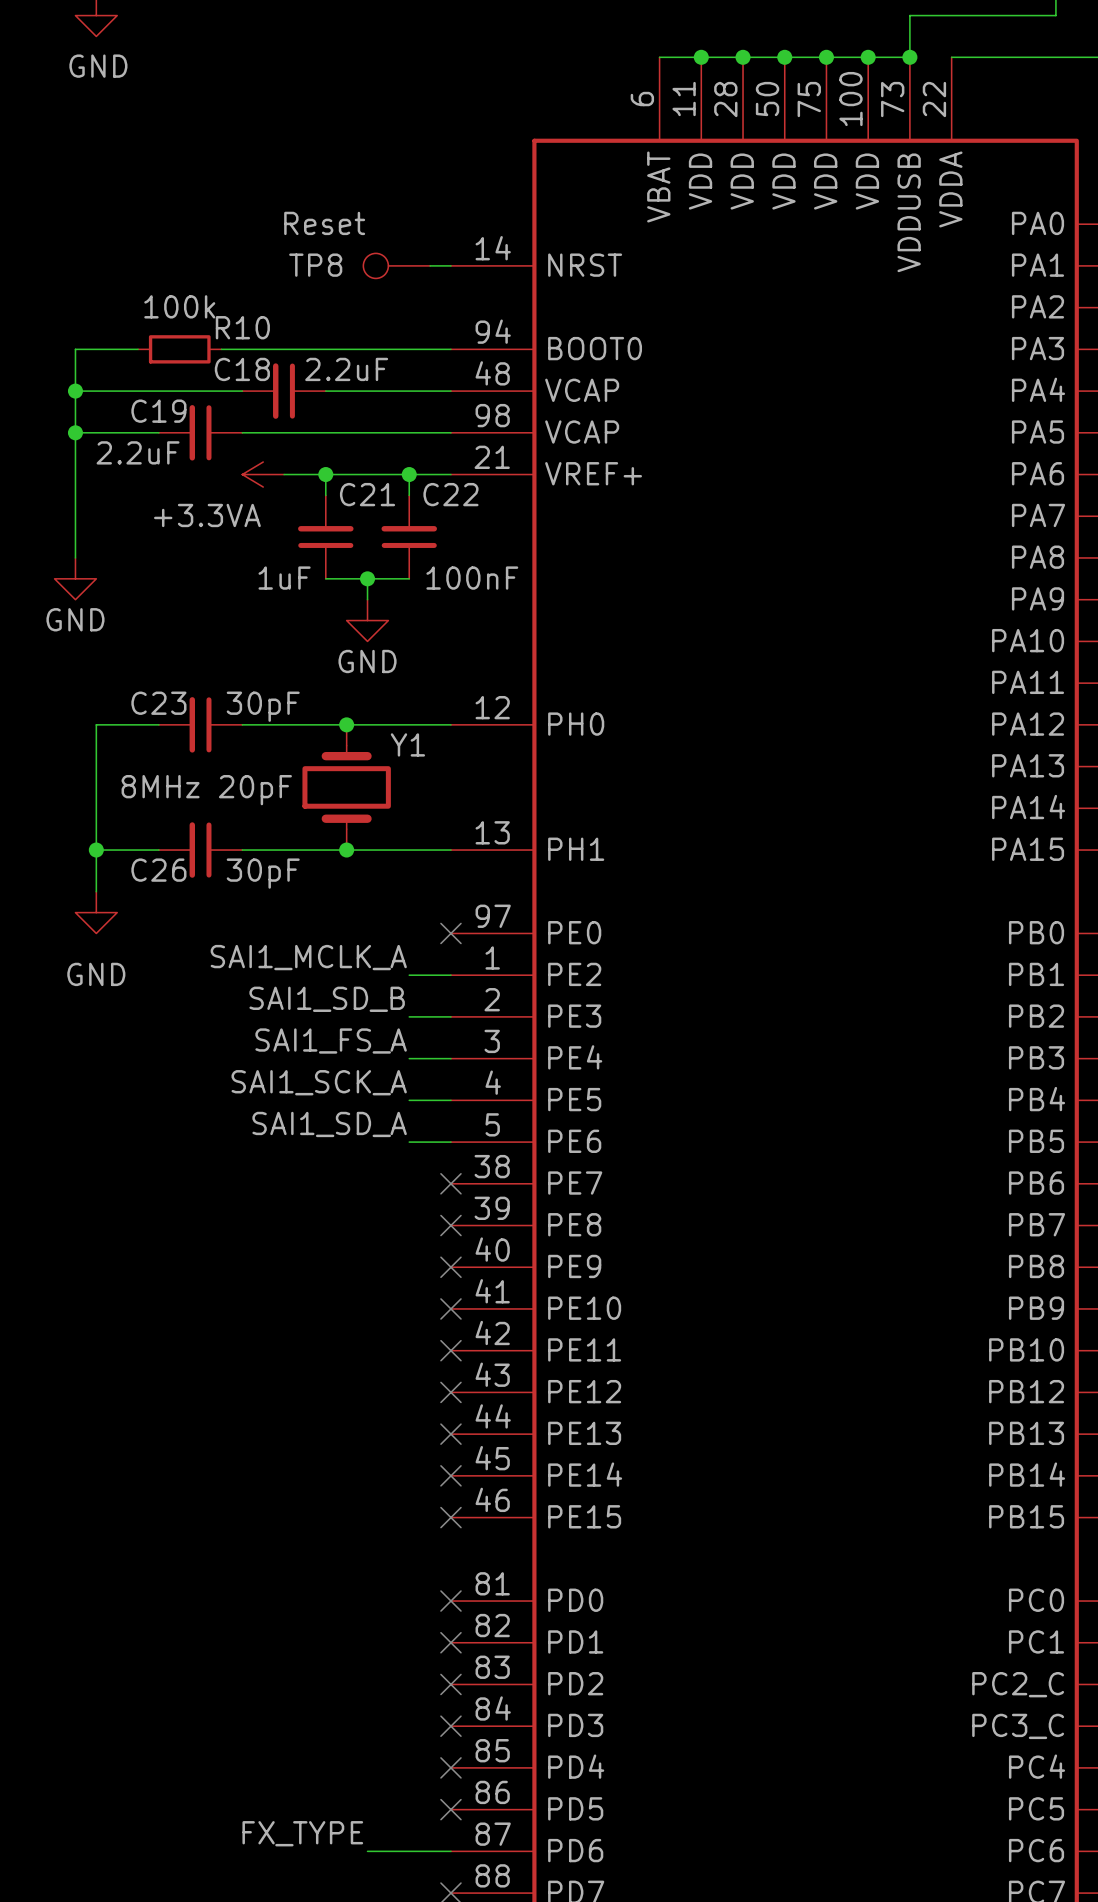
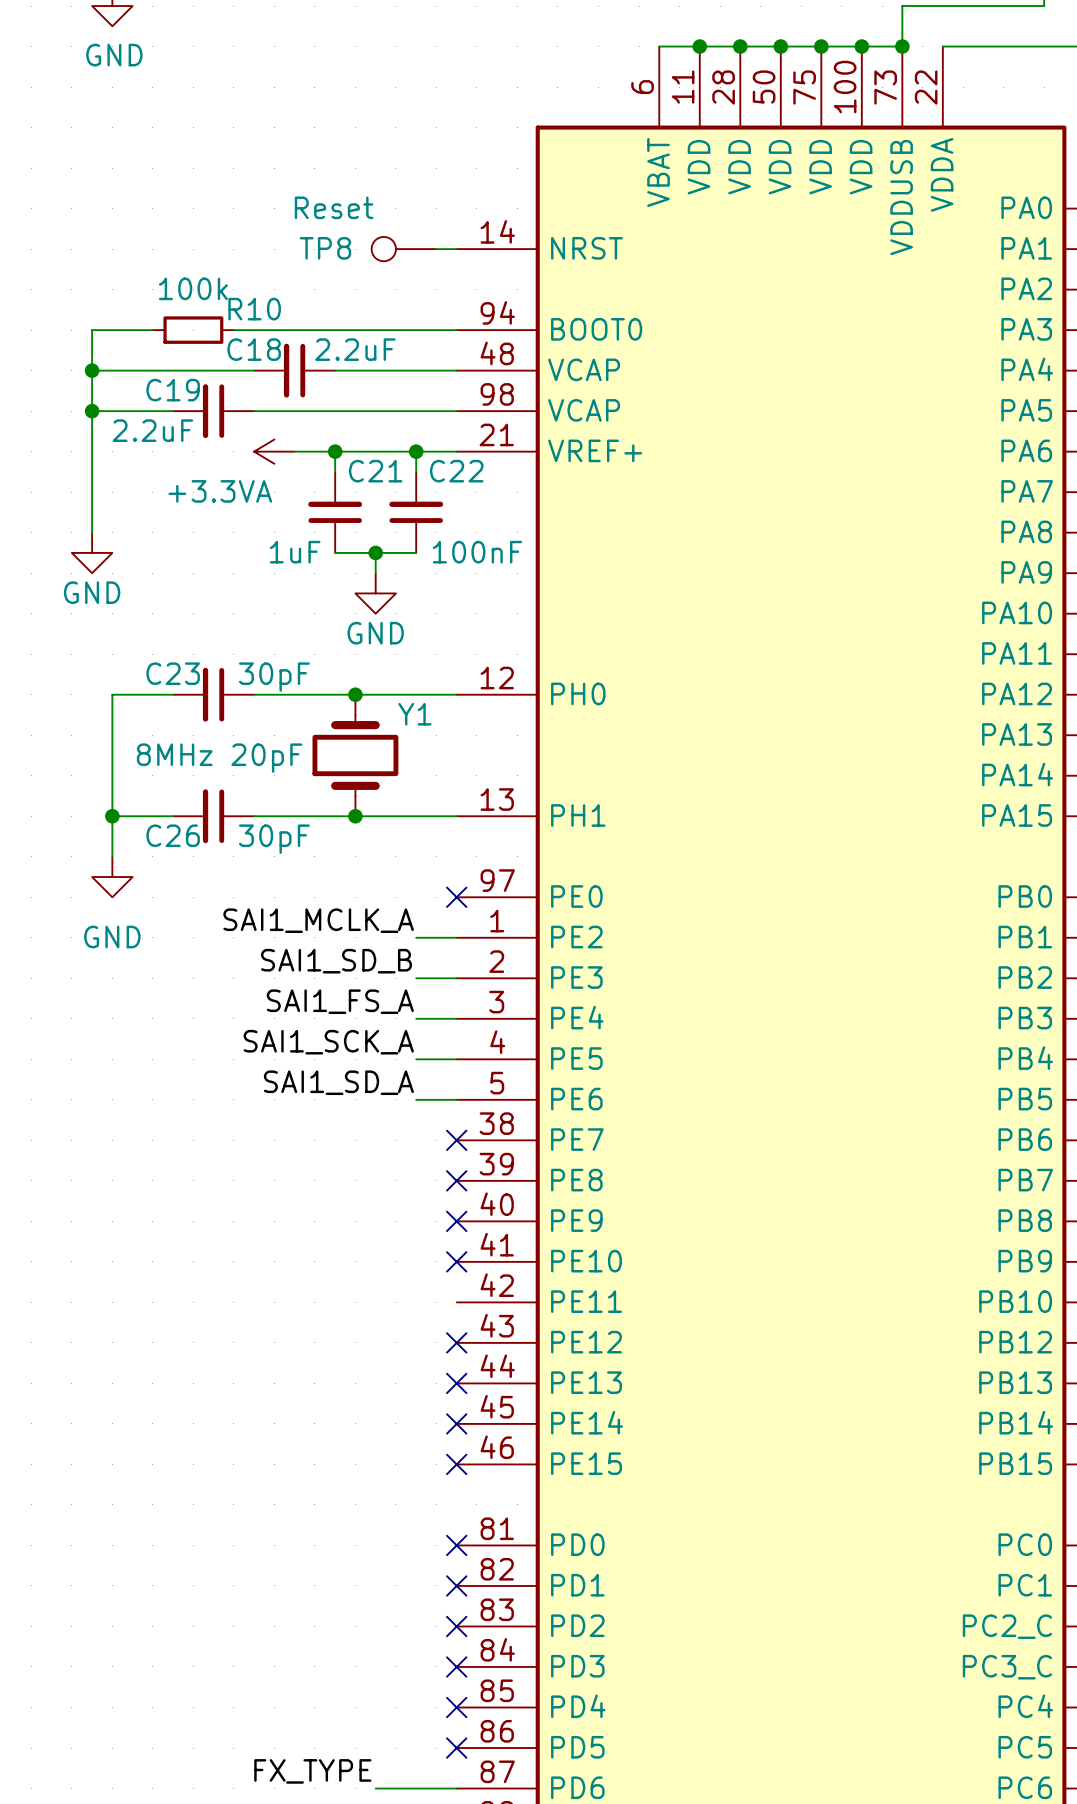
no-connect mark: (450, 1350) -> none

